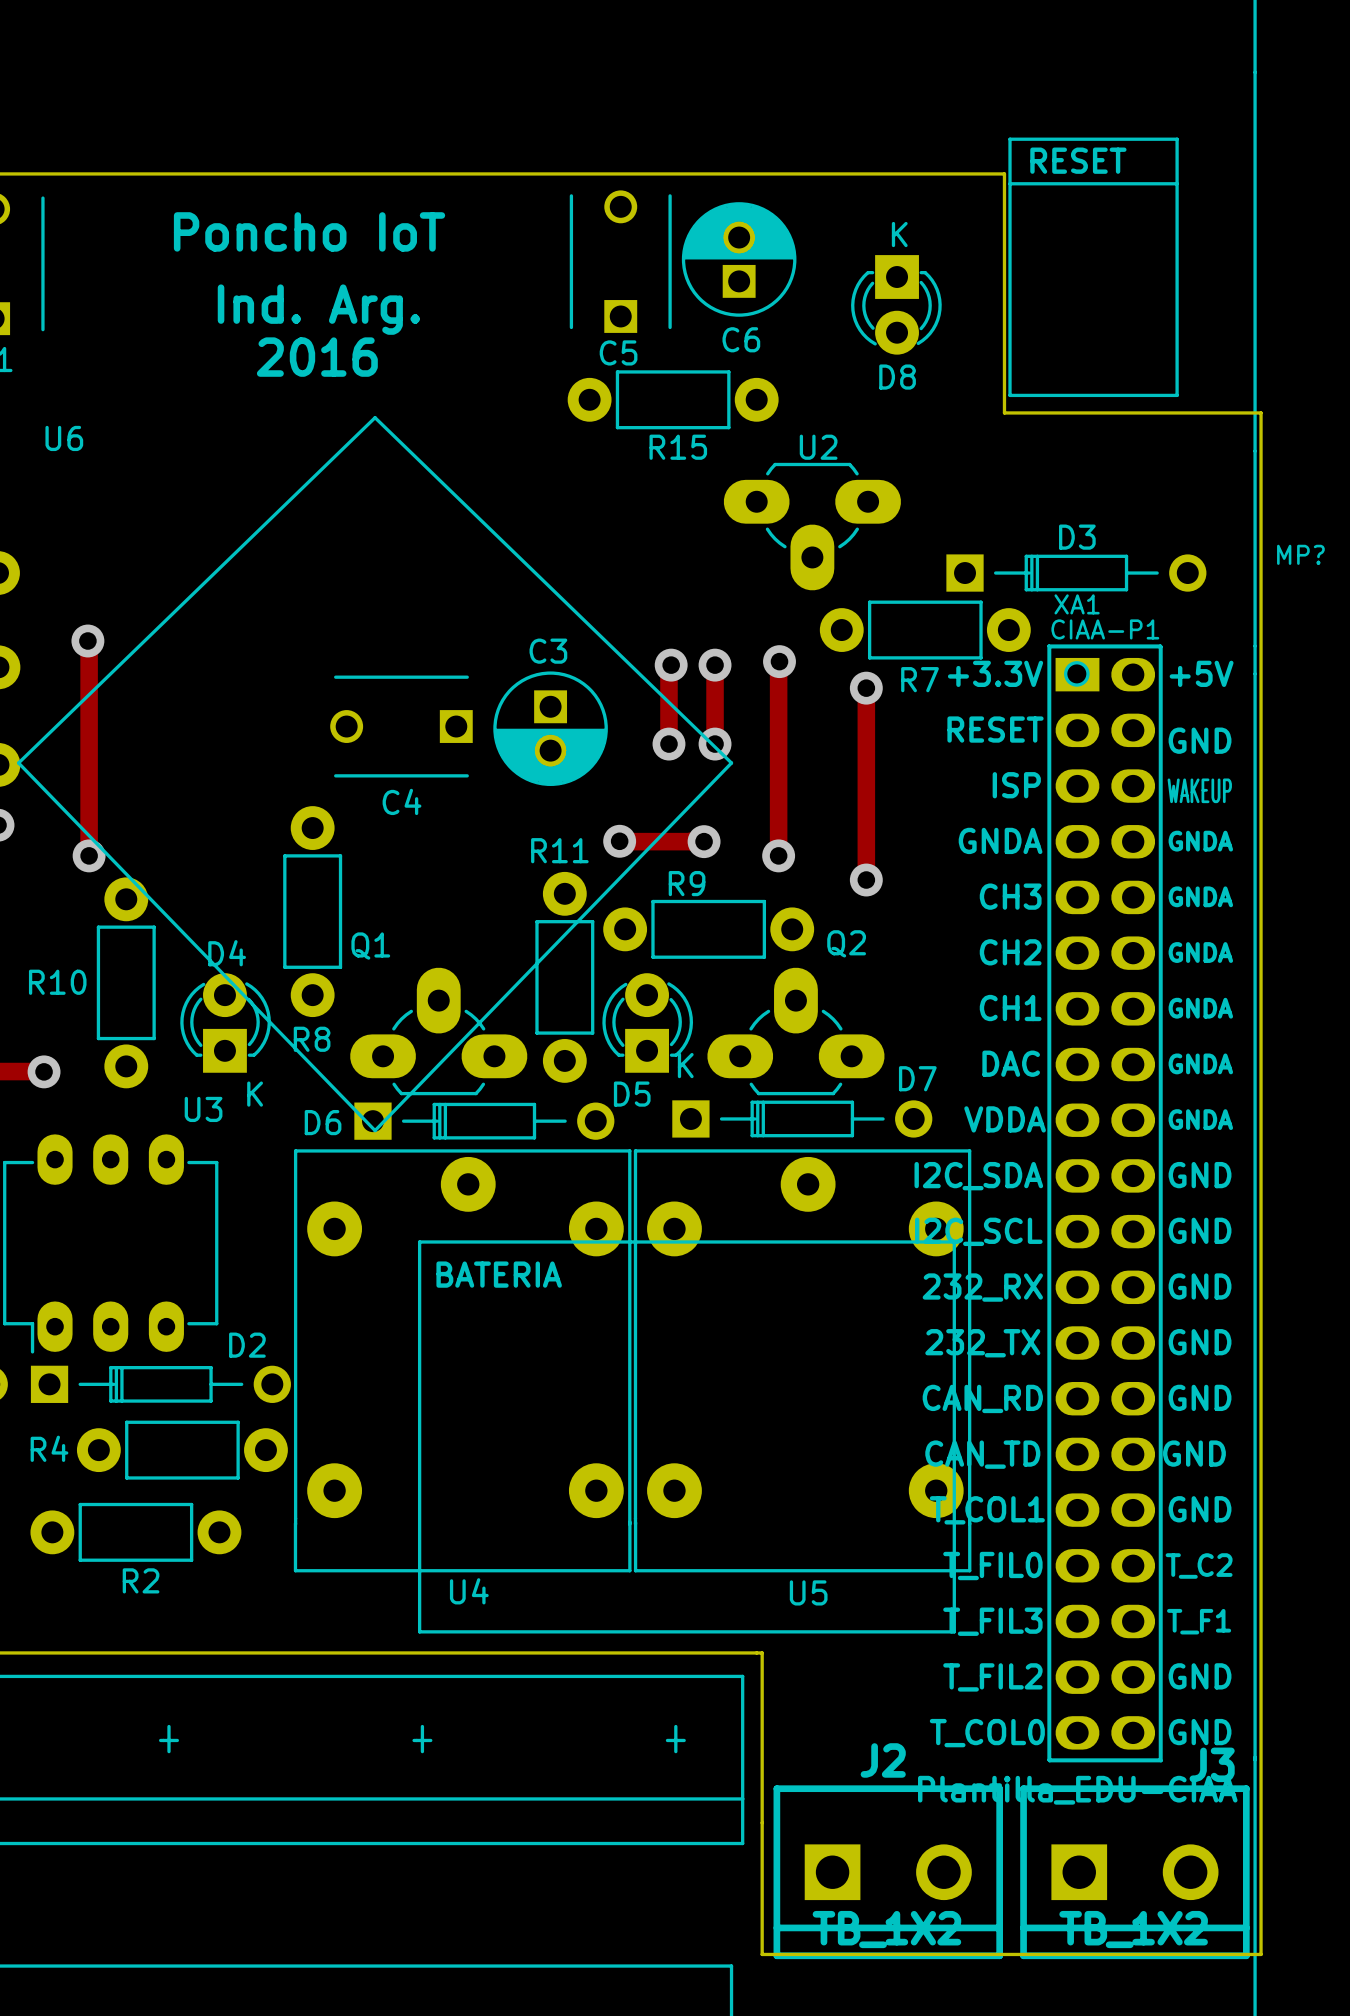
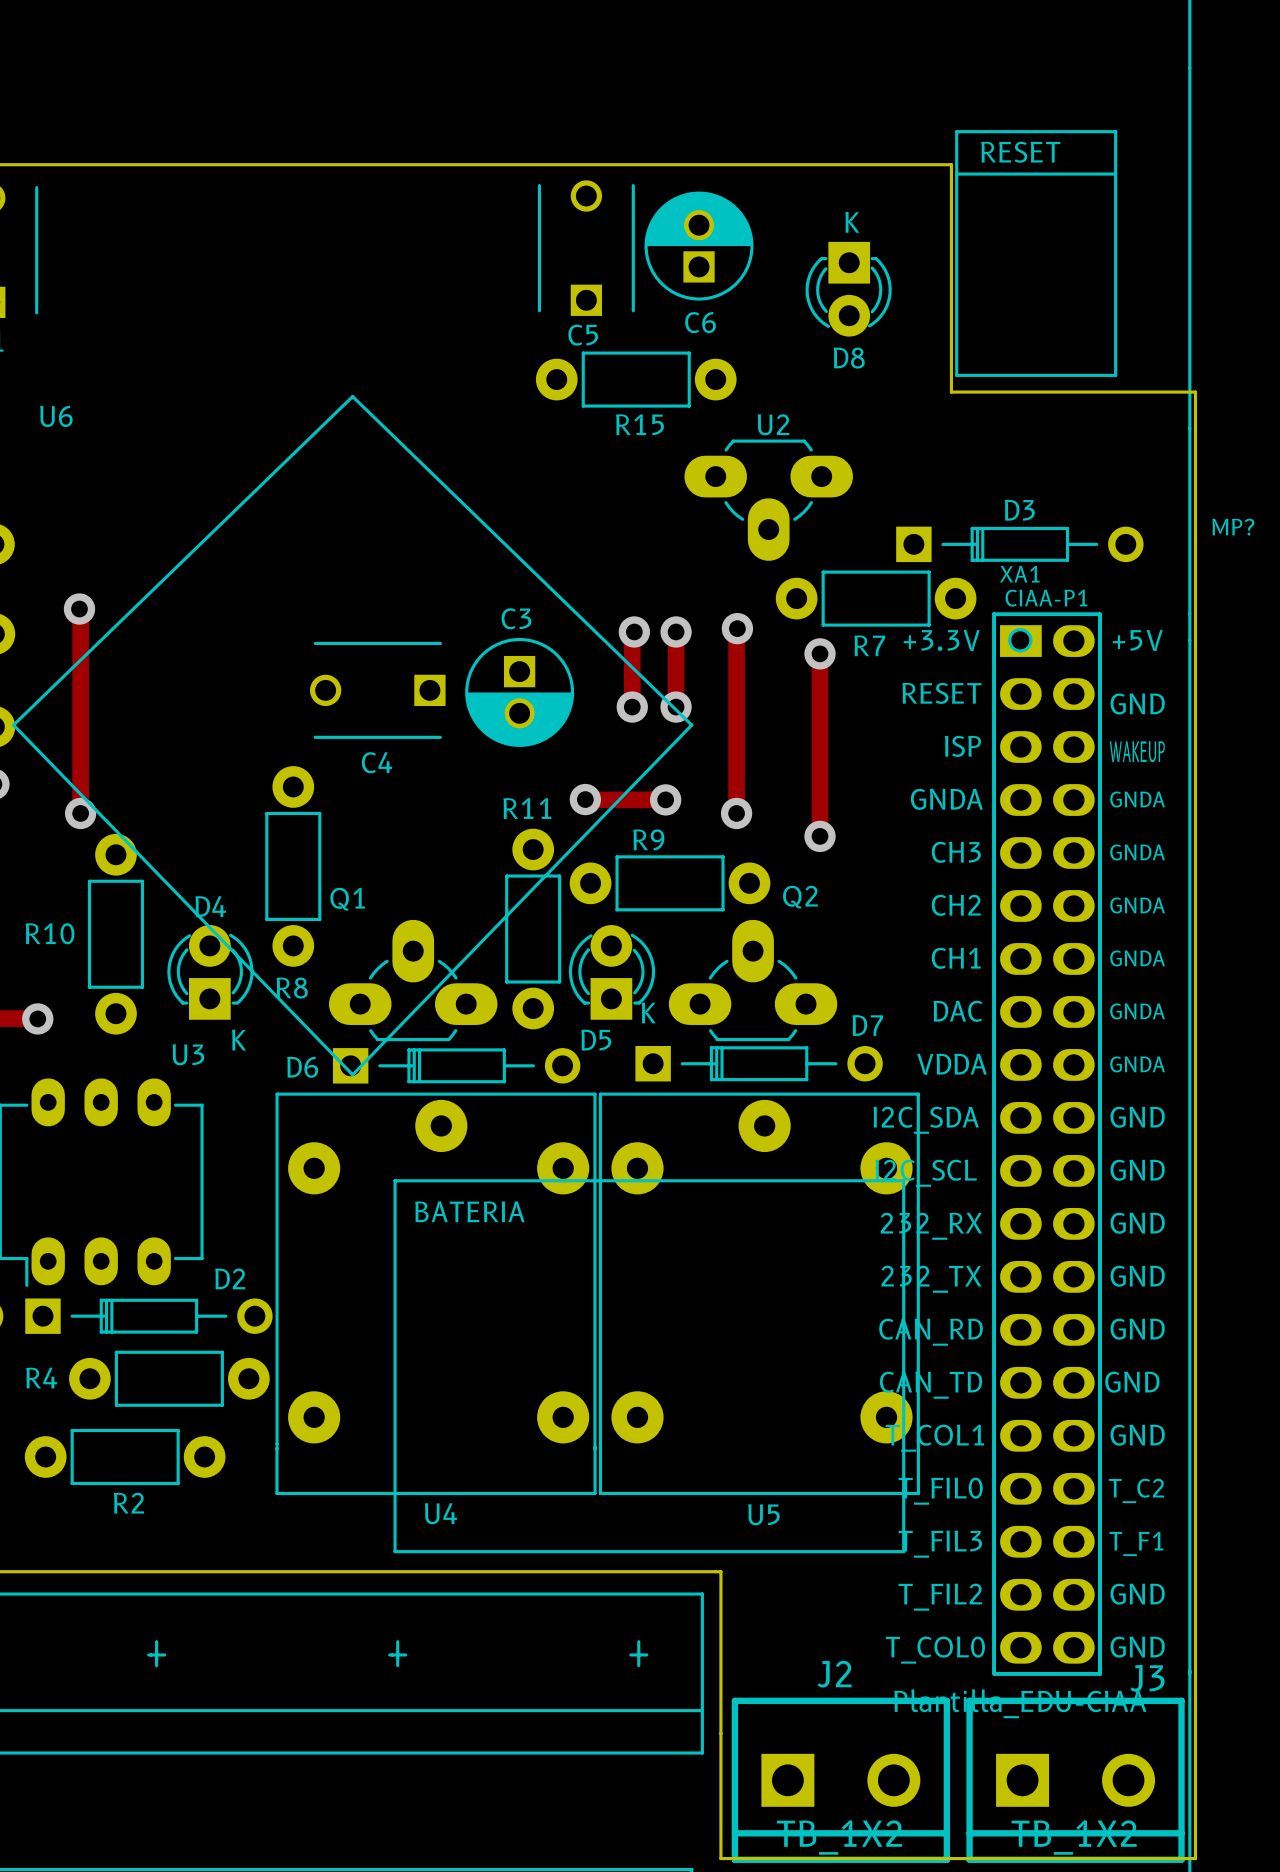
text: Poncho IoT (309, 231) -> none
text: Ind. Arg. (318, 309) -> none
text: 2016 (317, 357) -> none

